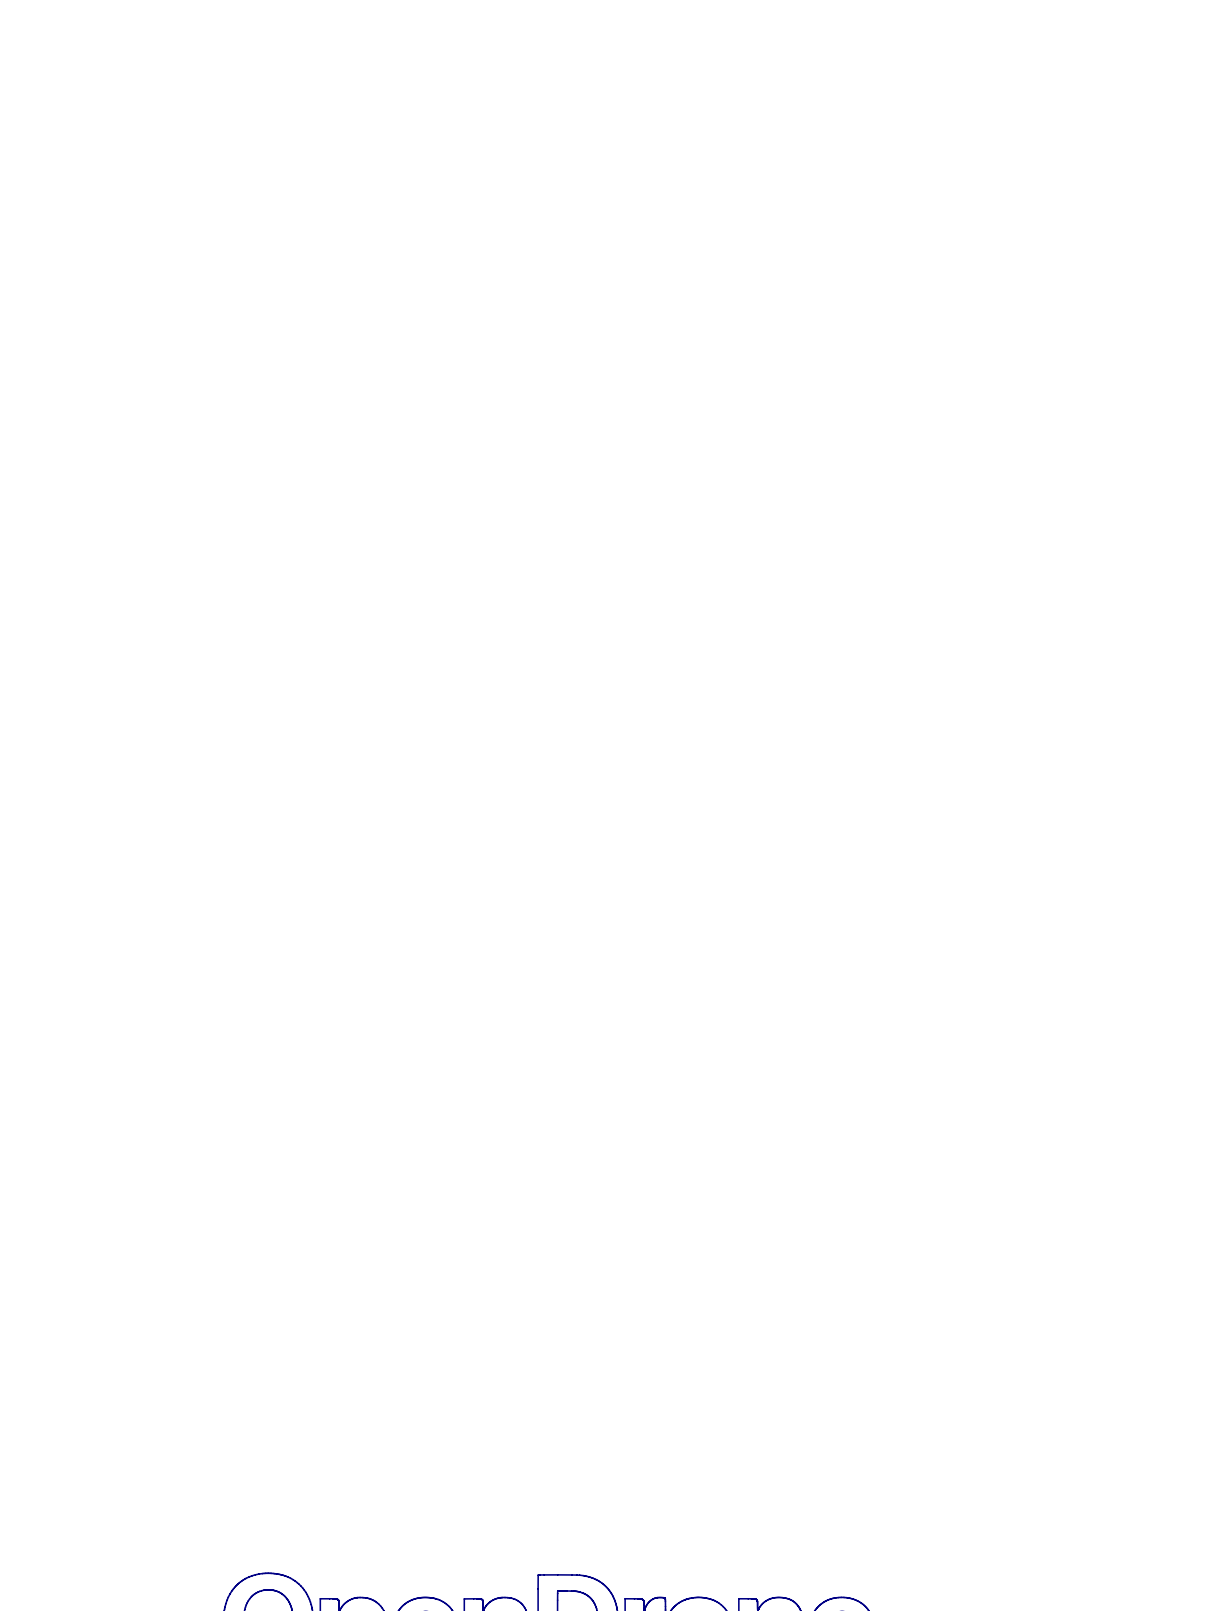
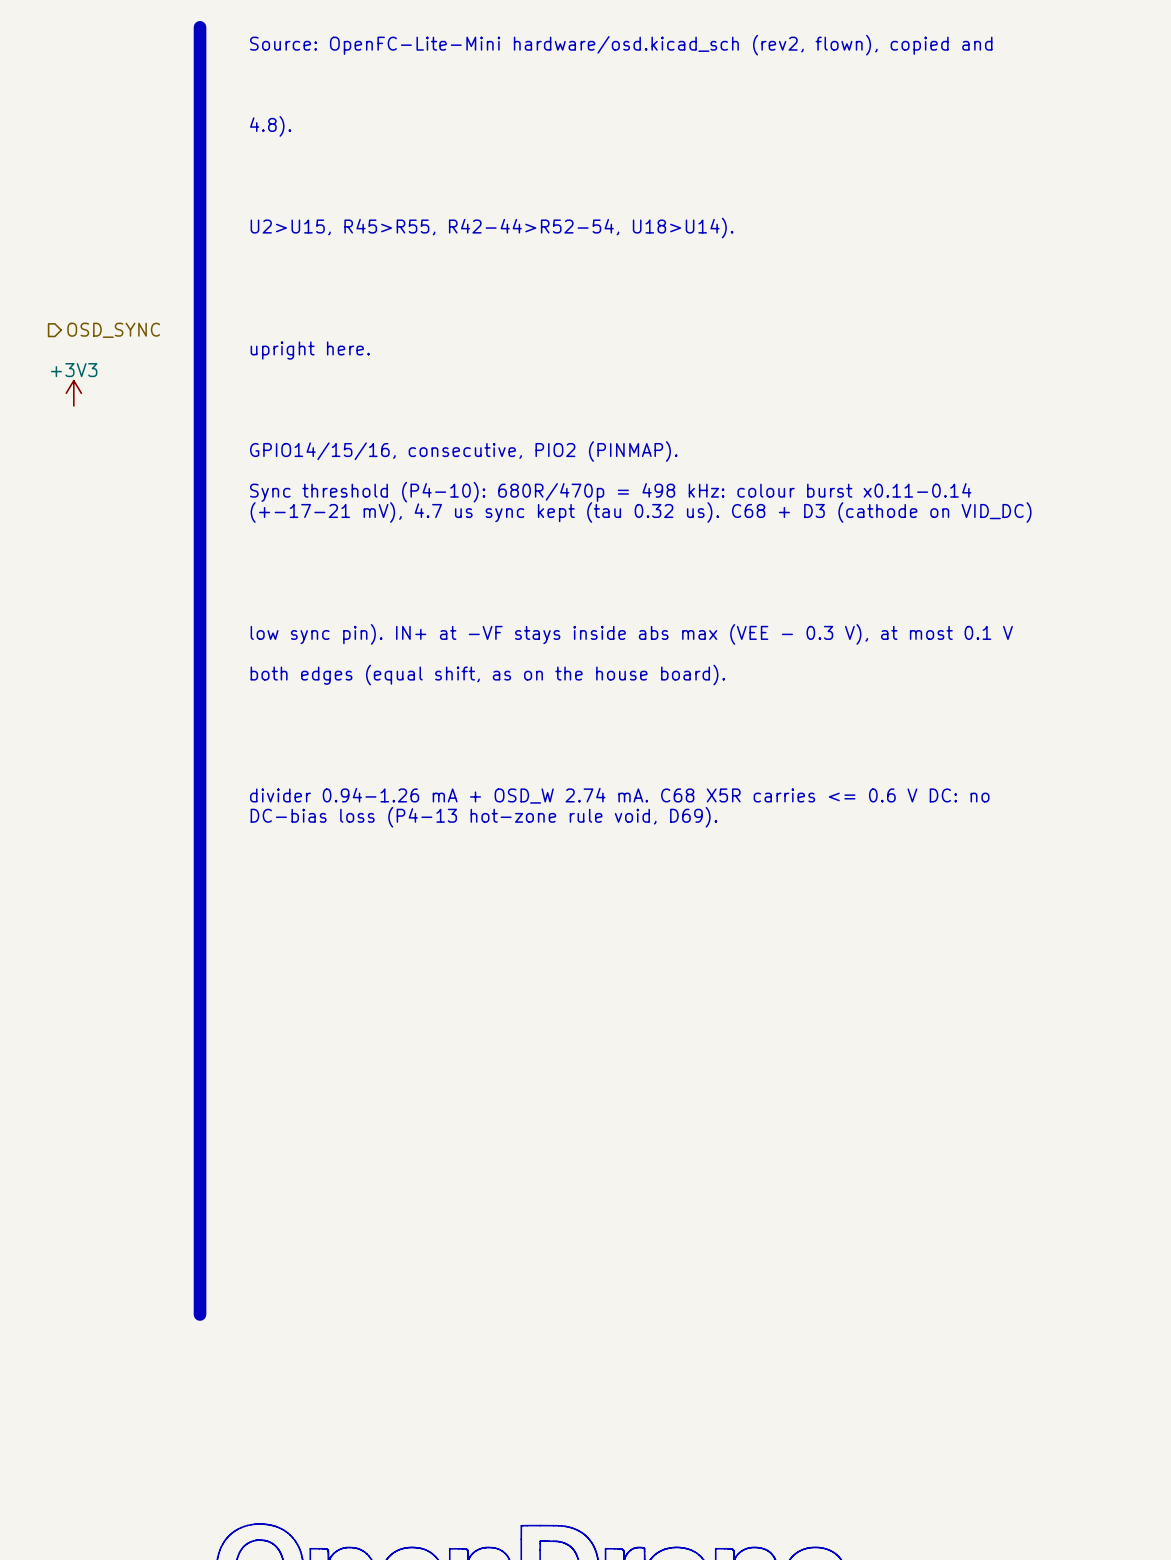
line: none -> (200, 27) (200, 1314) (200, 27)
text: none -> Source: OpenFC-Lite-Mini hardware/osd.kicad_sch (rev2, flown), copied and (621, 45)
text: none -> 4.8). (270, 126)
text: none -> U2>U15, R45>R55, R42-44>R52-54, U18>U14). (492, 228)
hierarchical label: none -> OSD_SYNC (113, 330)
text: none -> upright here. (310, 350)
power symbol: none -> +3V3 (73, 393)
text: none -> GPIO14/15/16, consecutive, PIO2 (PINMAP). (463, 451)
text: none -> Sync threshold (P4-10): 680R/470p = 498 kHz: colour burst x0.11-0.14 (610, 492)
text: none -> (+-17-21 mV), 4.7 us sync kept (tau 0.32 us). C68 + D3 (cathode on VID_DC) (641, 512)
text: none -> low sync pin). IN+ at -VF stays inside abs max (VEE - 0.3 V), at most 0.1 V (631, 634)
text: none -> both edges (equal shift, as on the house board). (487, 675)
text: none -> divider 0.94-1.26 mA + OSD_W 2.74 mA. C68 X5R carries <= 0.6 V DC: no (619, 795)
text: none -> DC-bias loss (P4-13 hot-zone rule void, D69). (483, 817)

